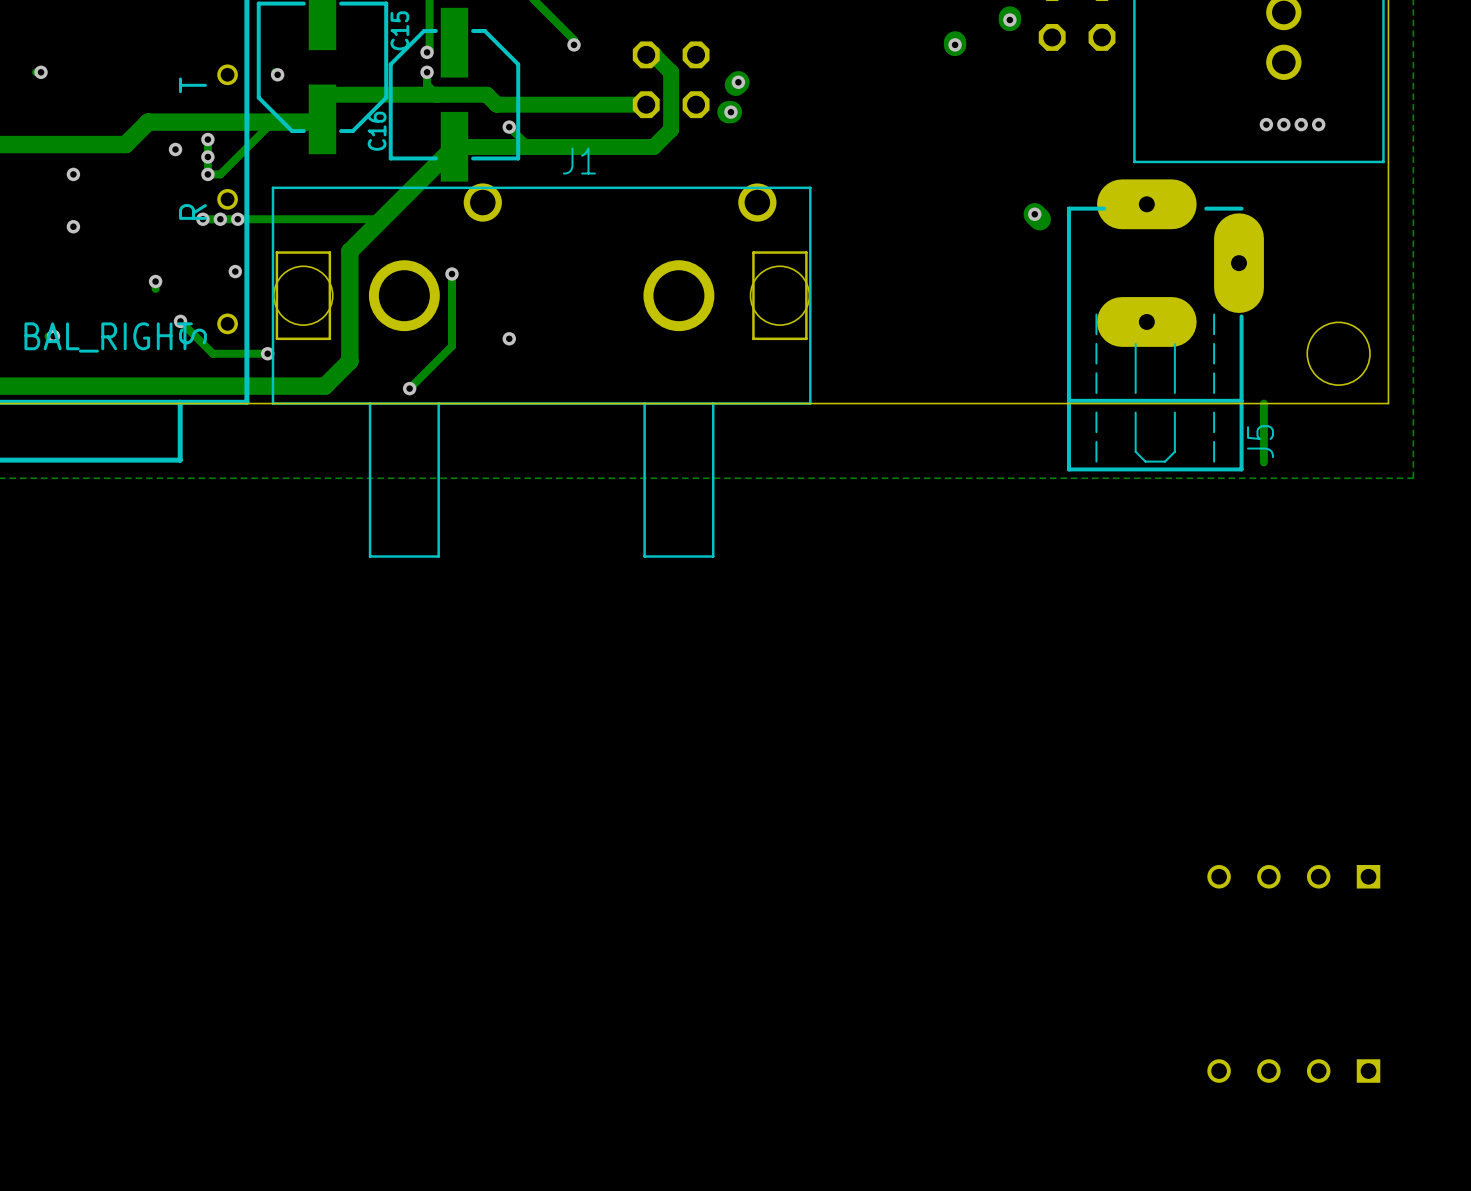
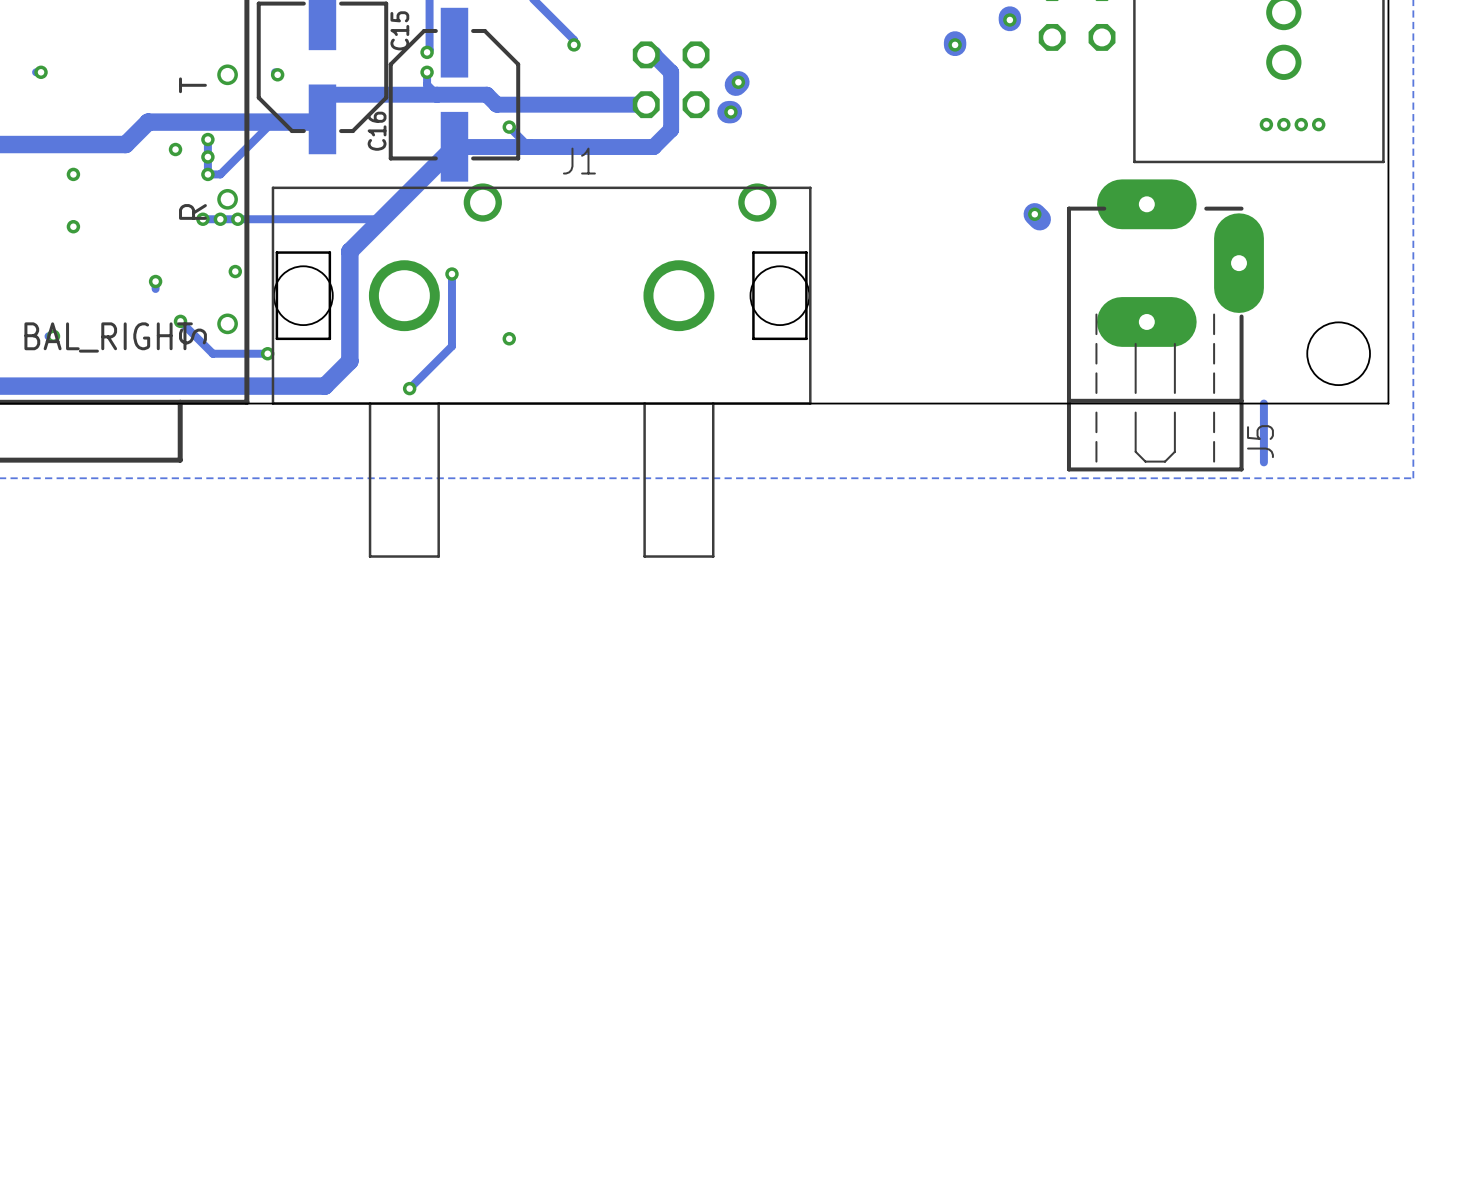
part: (1293, 876) -> none
part: (1293, 1071) -> none

